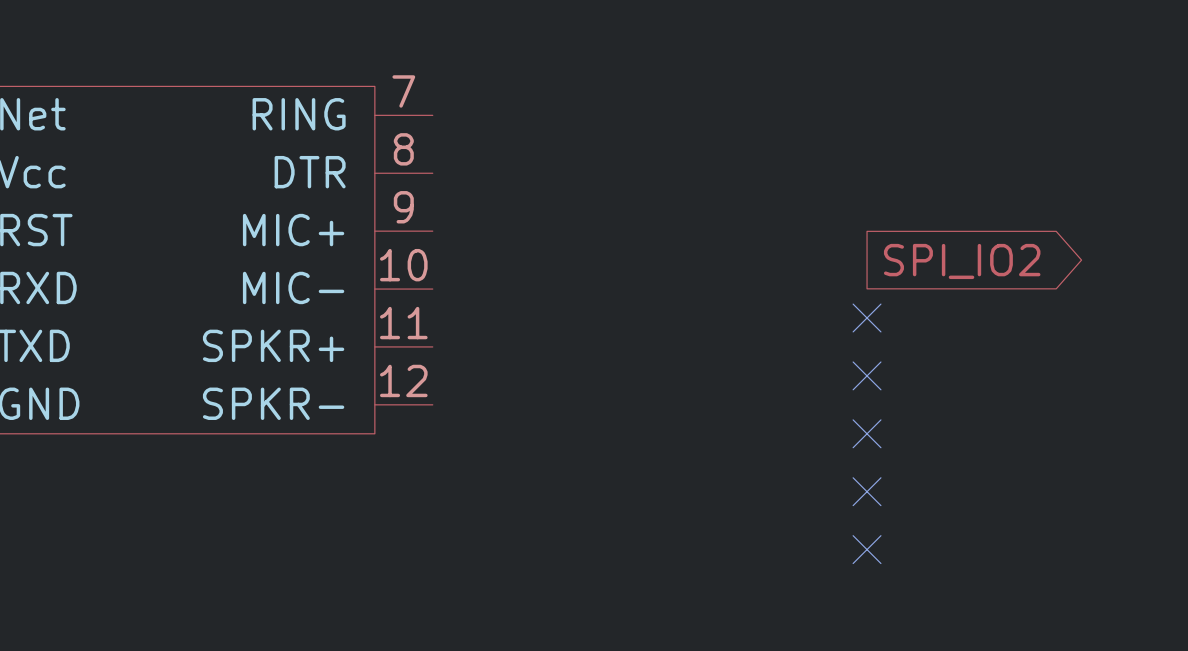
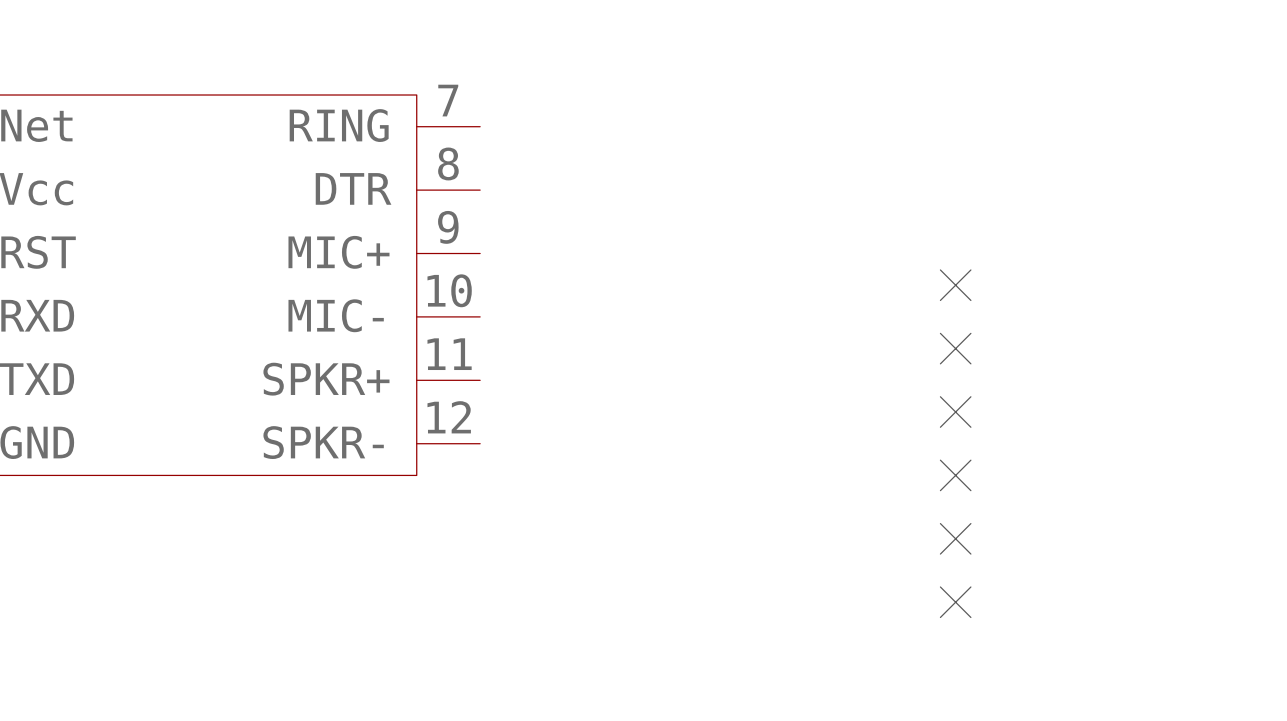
no-connect mark: none -> (955, 285)
global label: SPI_IO2 (962, 261) -> none

